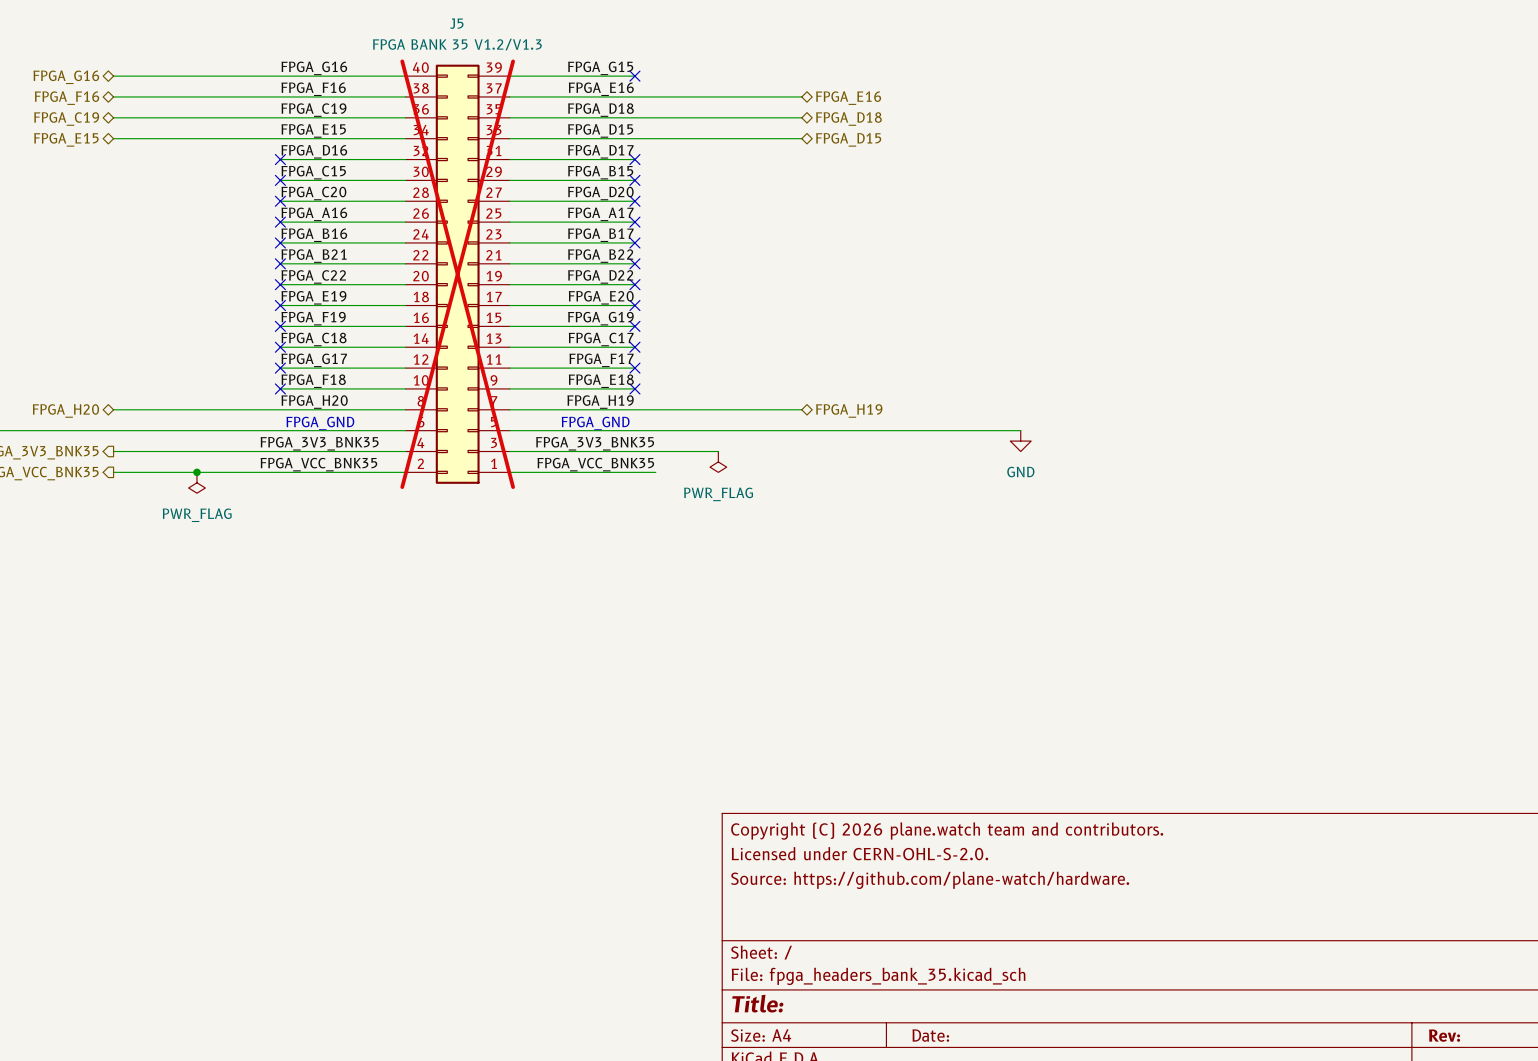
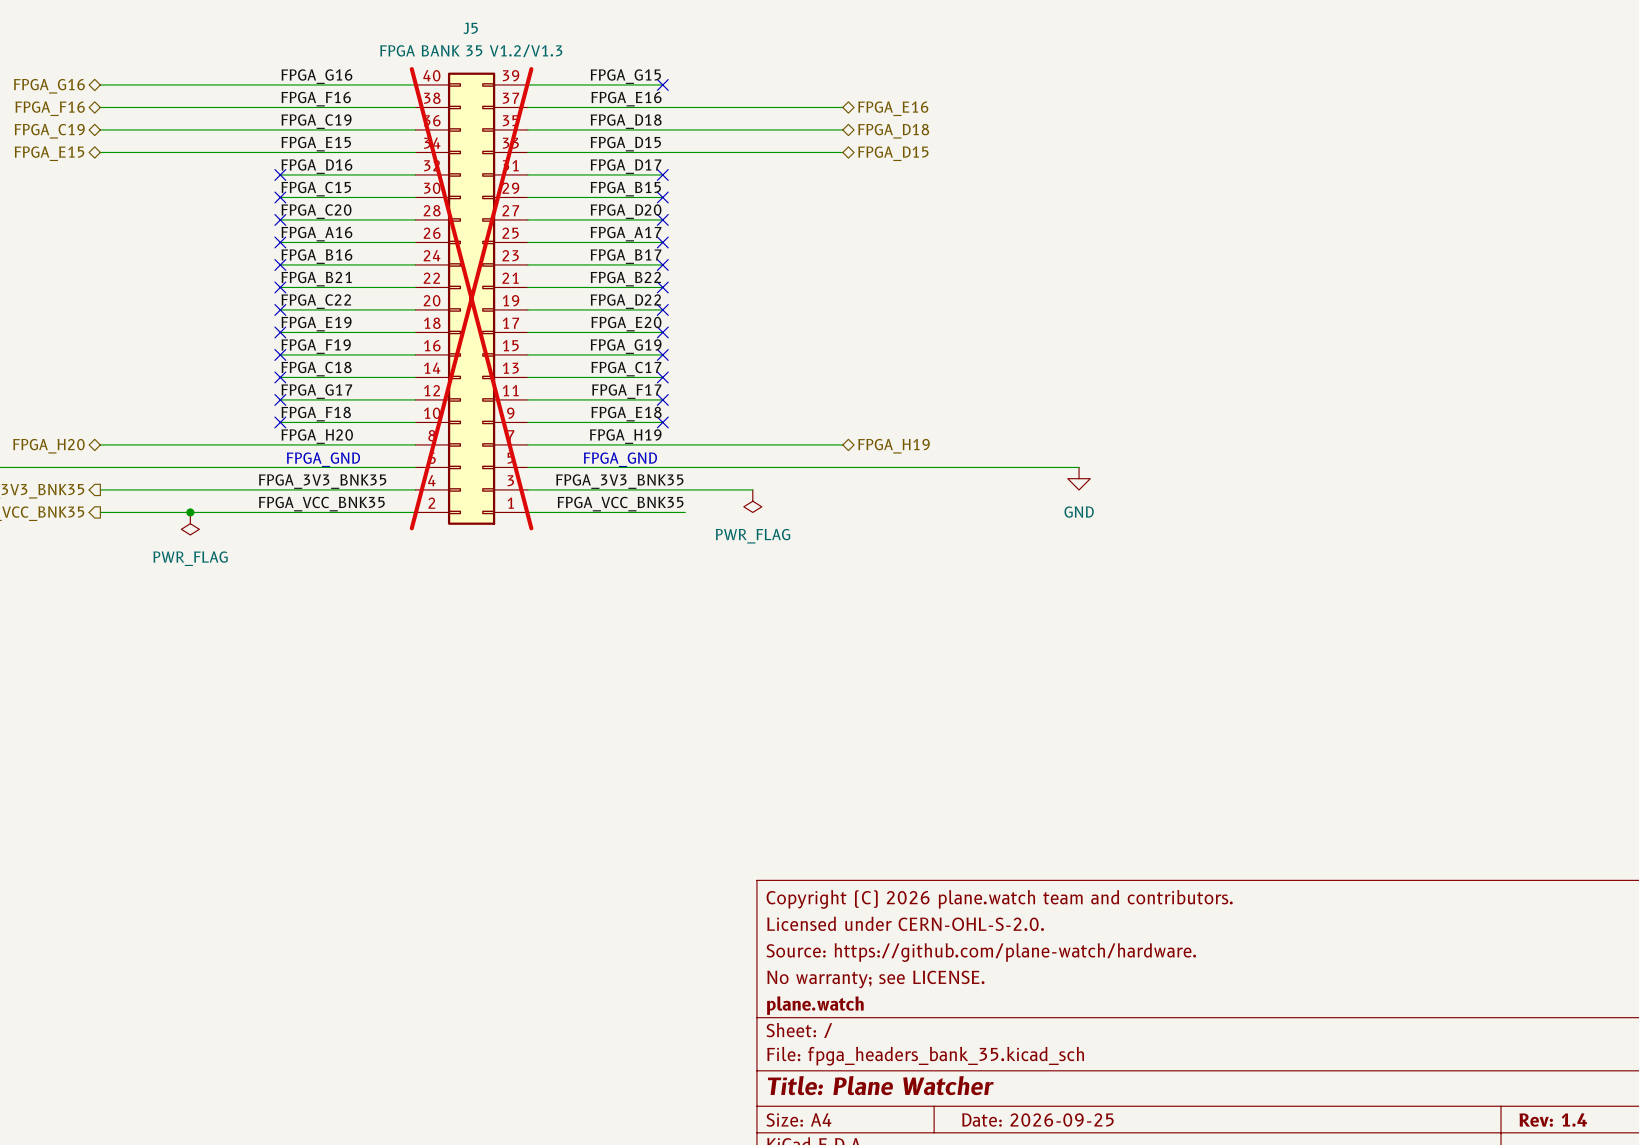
title block: none -> No warranty; see LICENSE. (875, 979)
title block: none -> plane.watch (815, 1005)
title block: Title: (757, 1003) -> Title: Plane Watcher (880, 1085)
title block: Date: (930, 1035) -> Date: 2026-09-25 (1037, 1120)
title block: Rev: (1444, 1035) -> Rev: 1.4 (1553, 1120)

